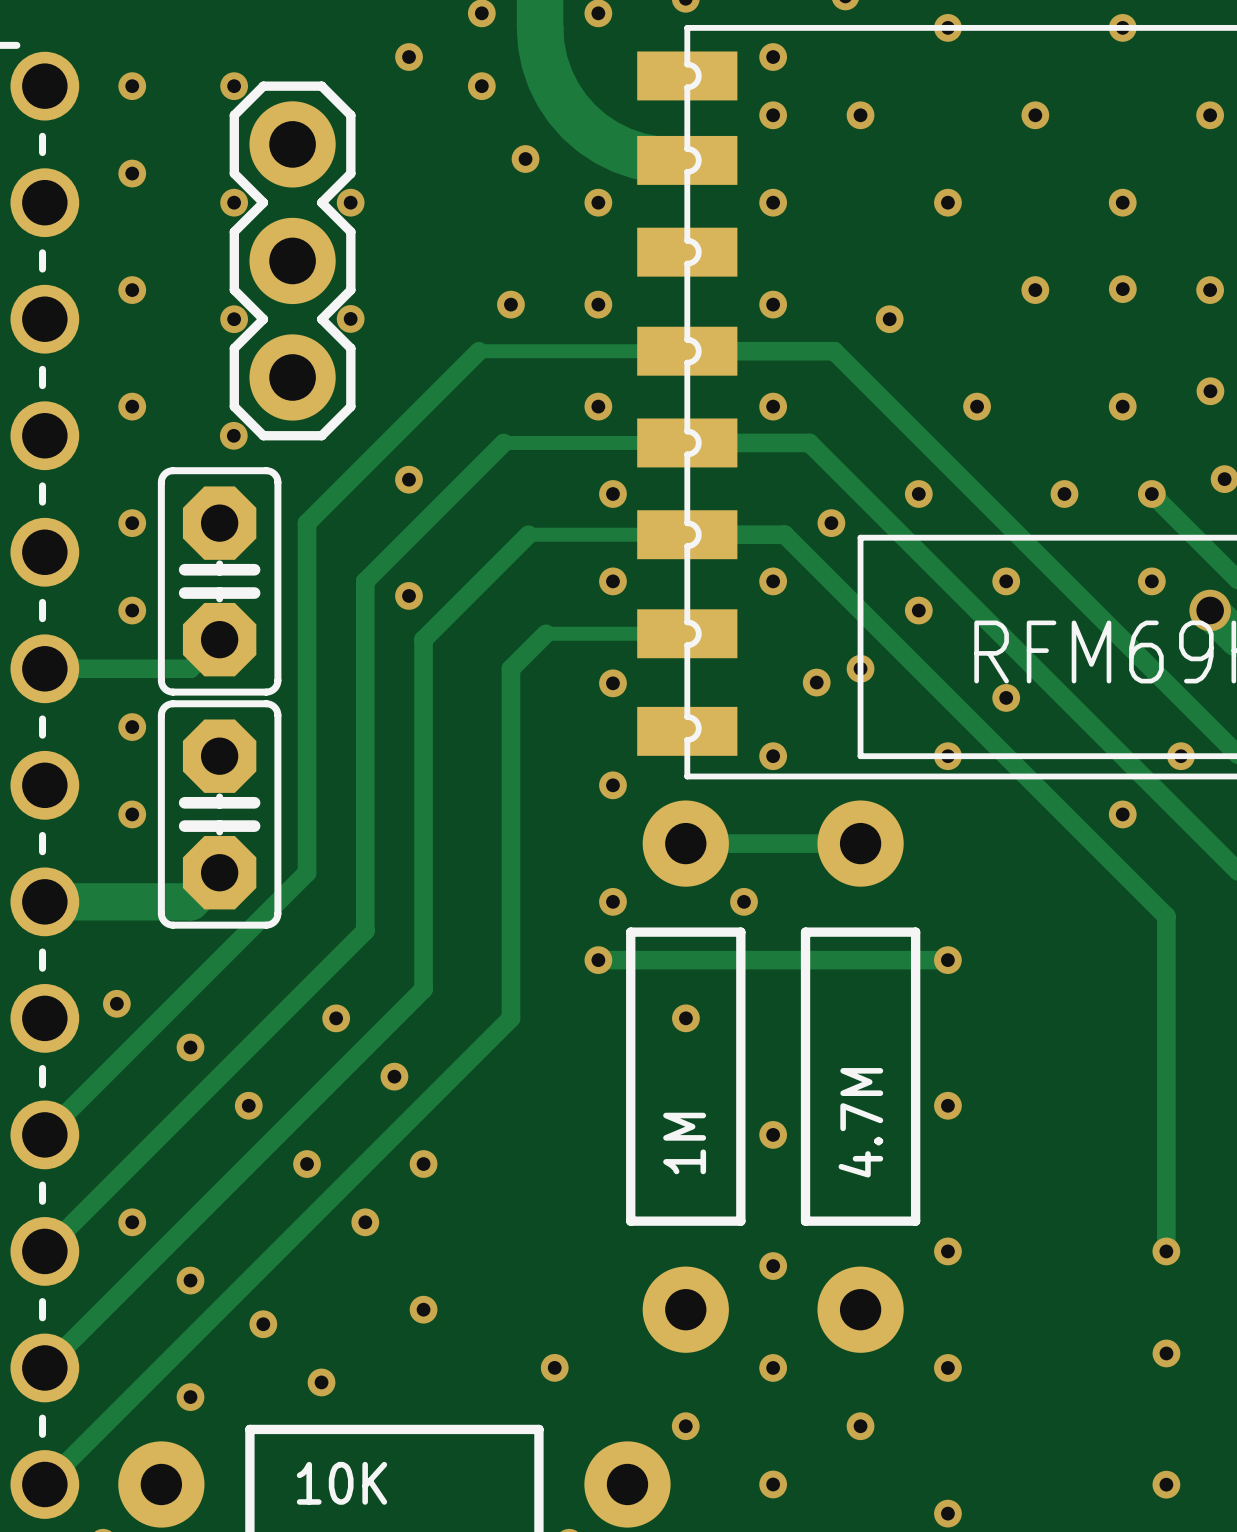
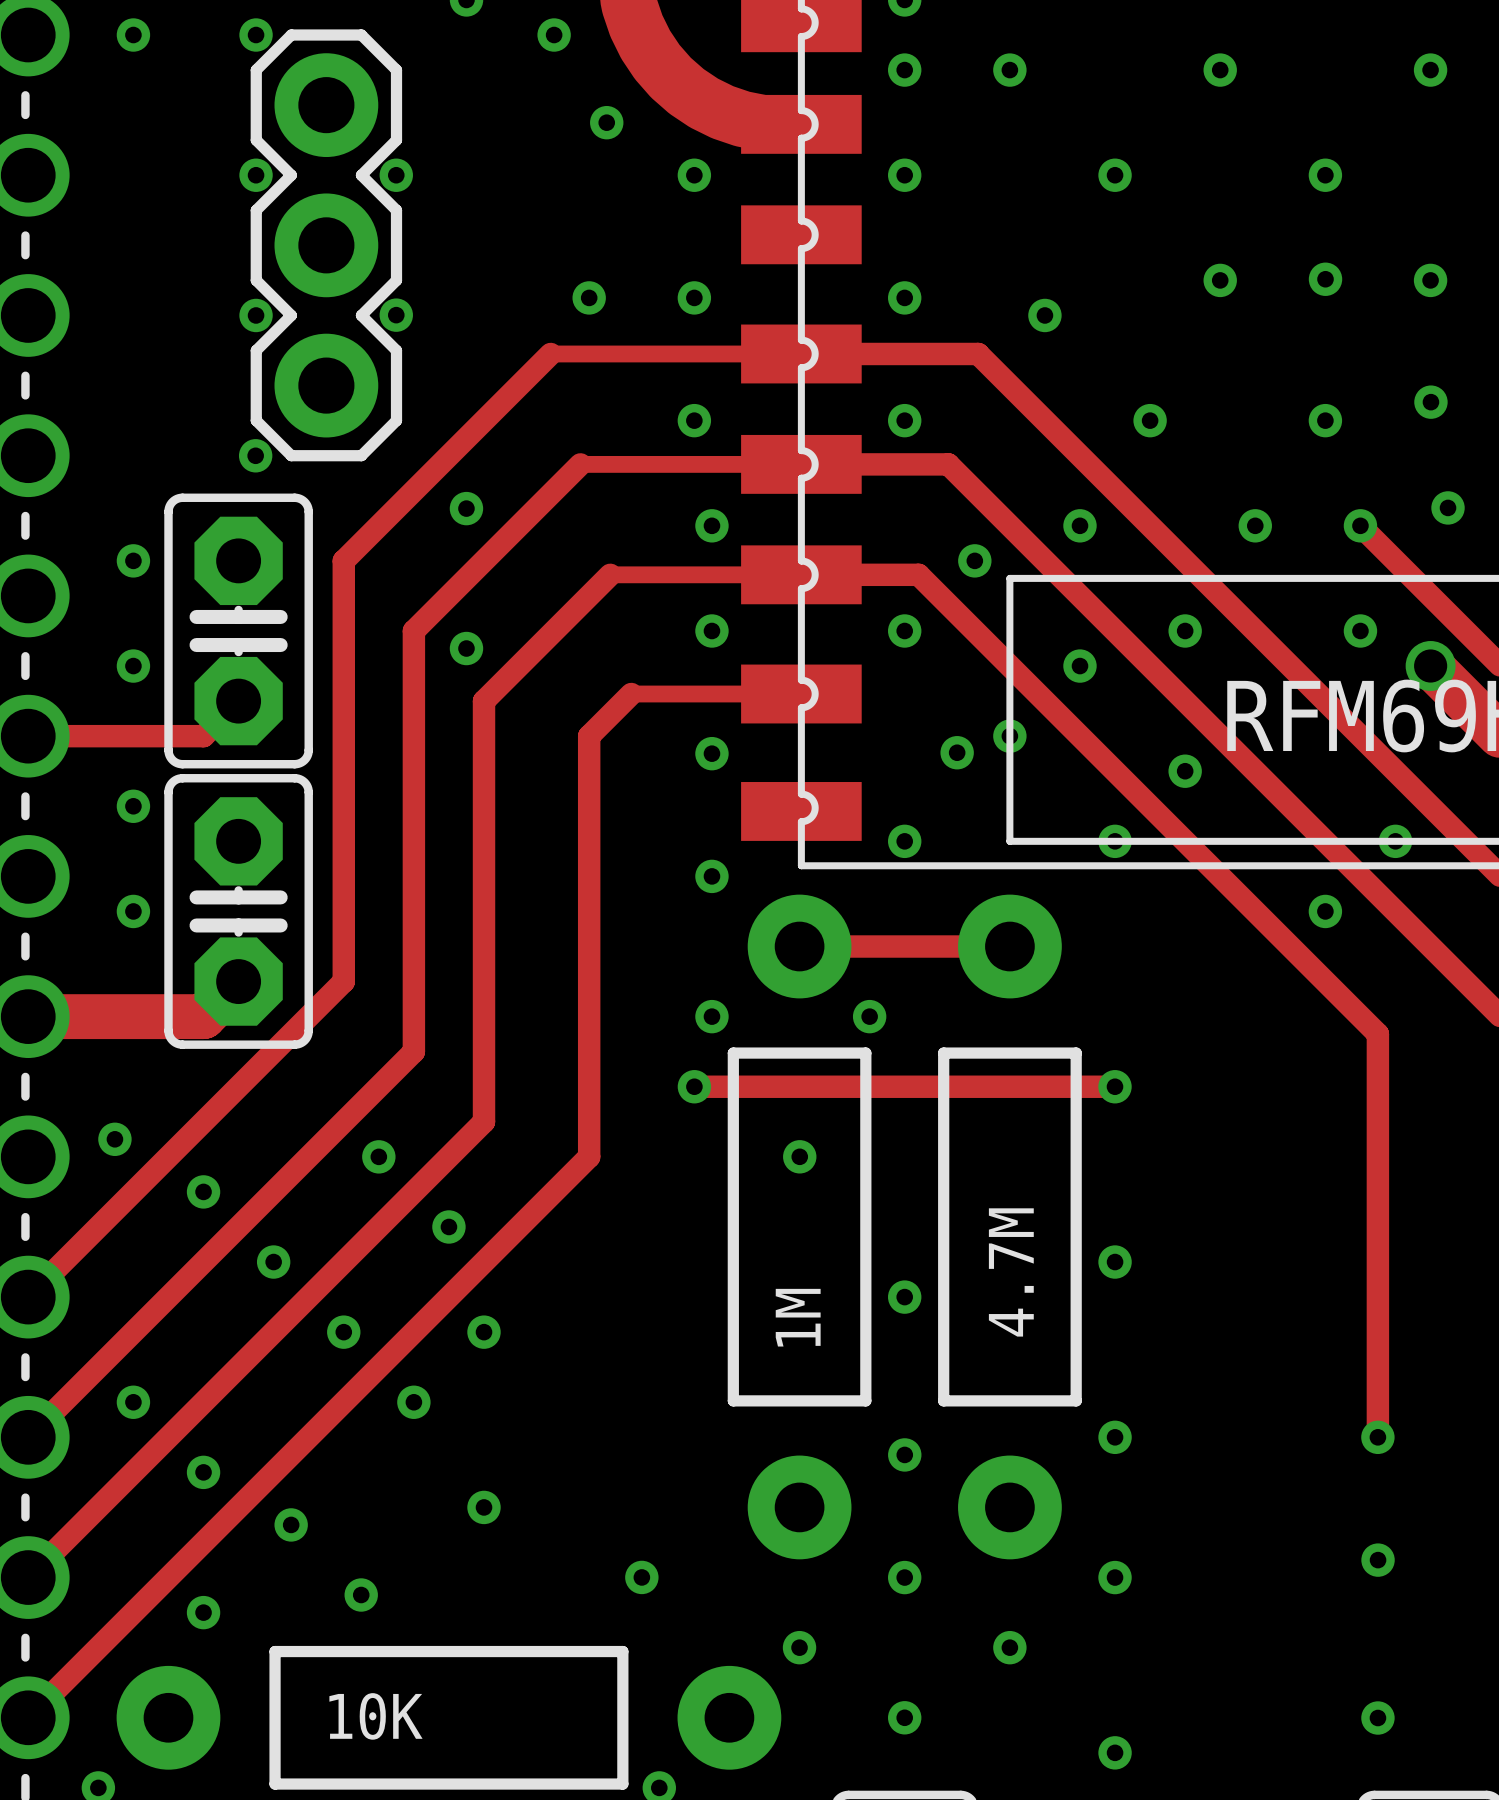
via: (132, 173) -> none
via: (132, 290) -> none
via: (132, 406) -> none

